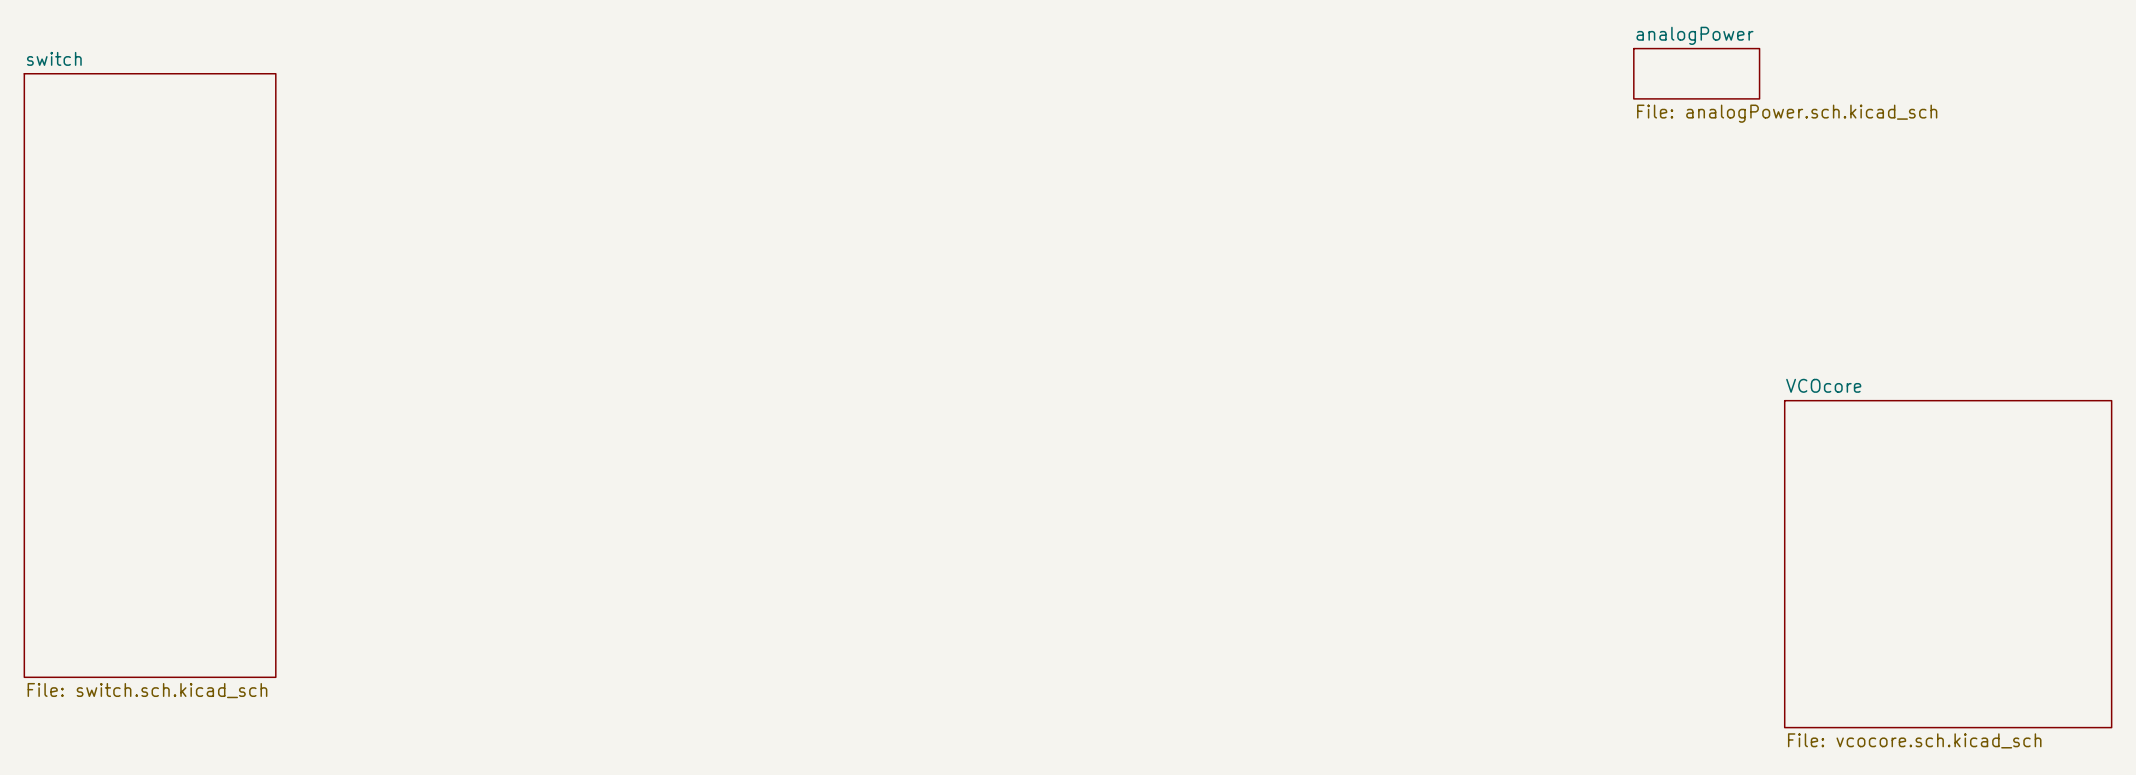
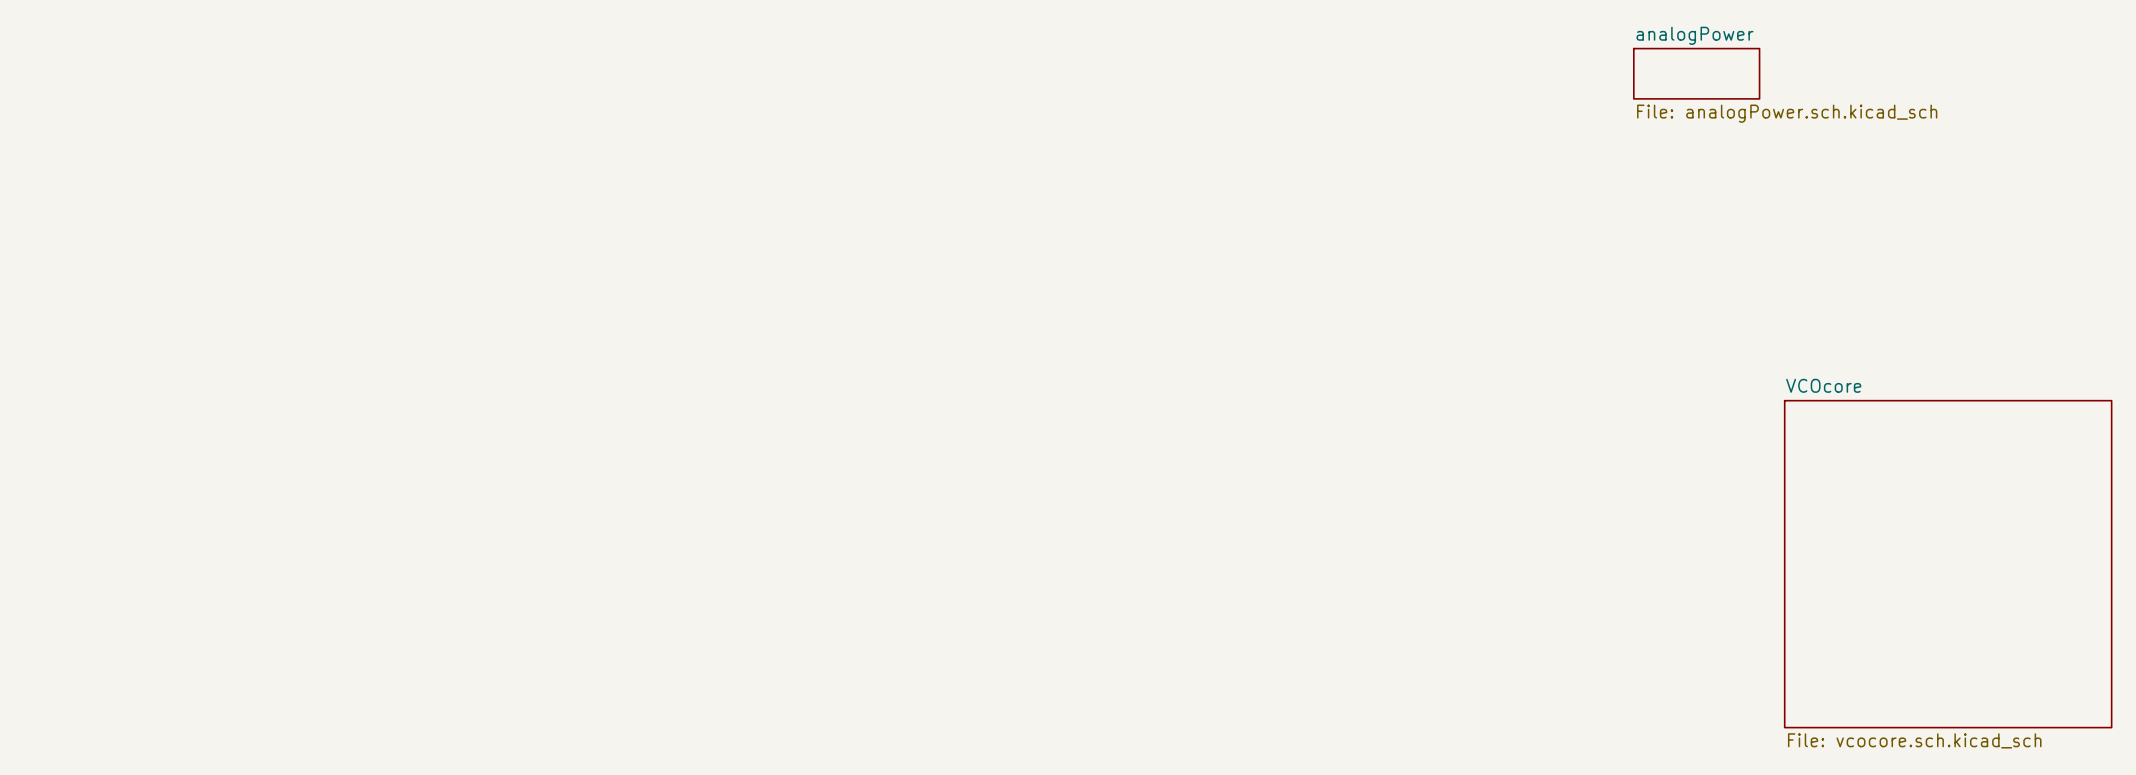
sheet switch: File: switch.sch.kicad_sch (150, 375) -> none

